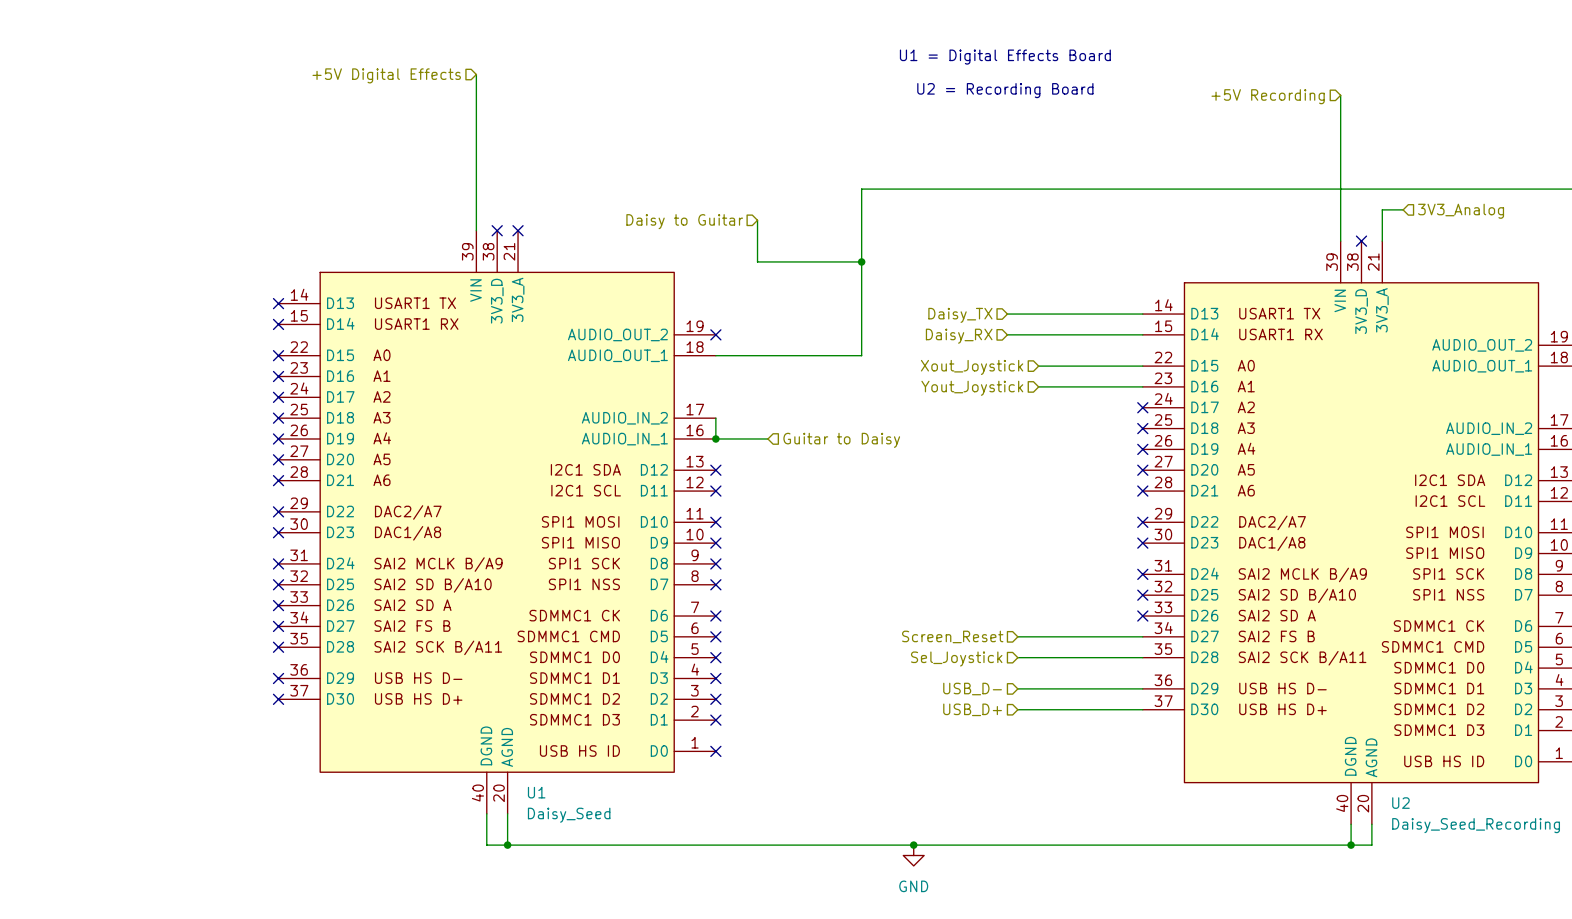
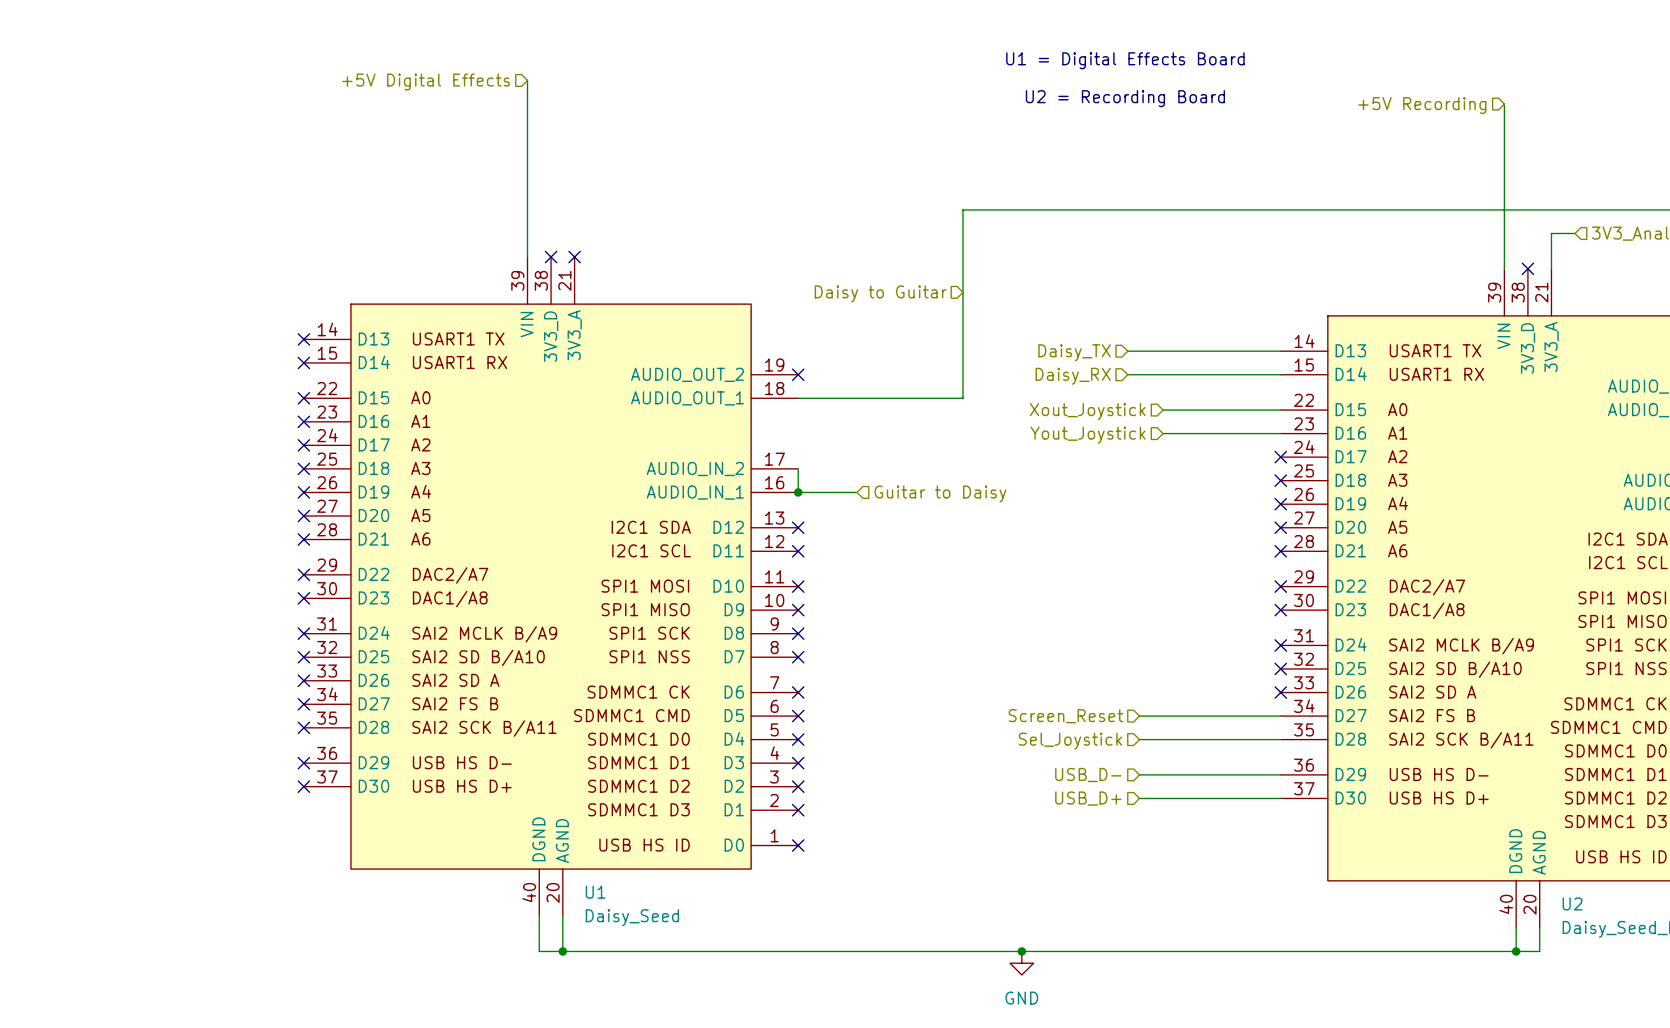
wire: (757, 220) (757, 261) (861, 261) -> none
hierarchical label position: Daisy to Guitar (684, 221) -> Daisy to Guitar (880, 293)
junction: (861, 261) -> none

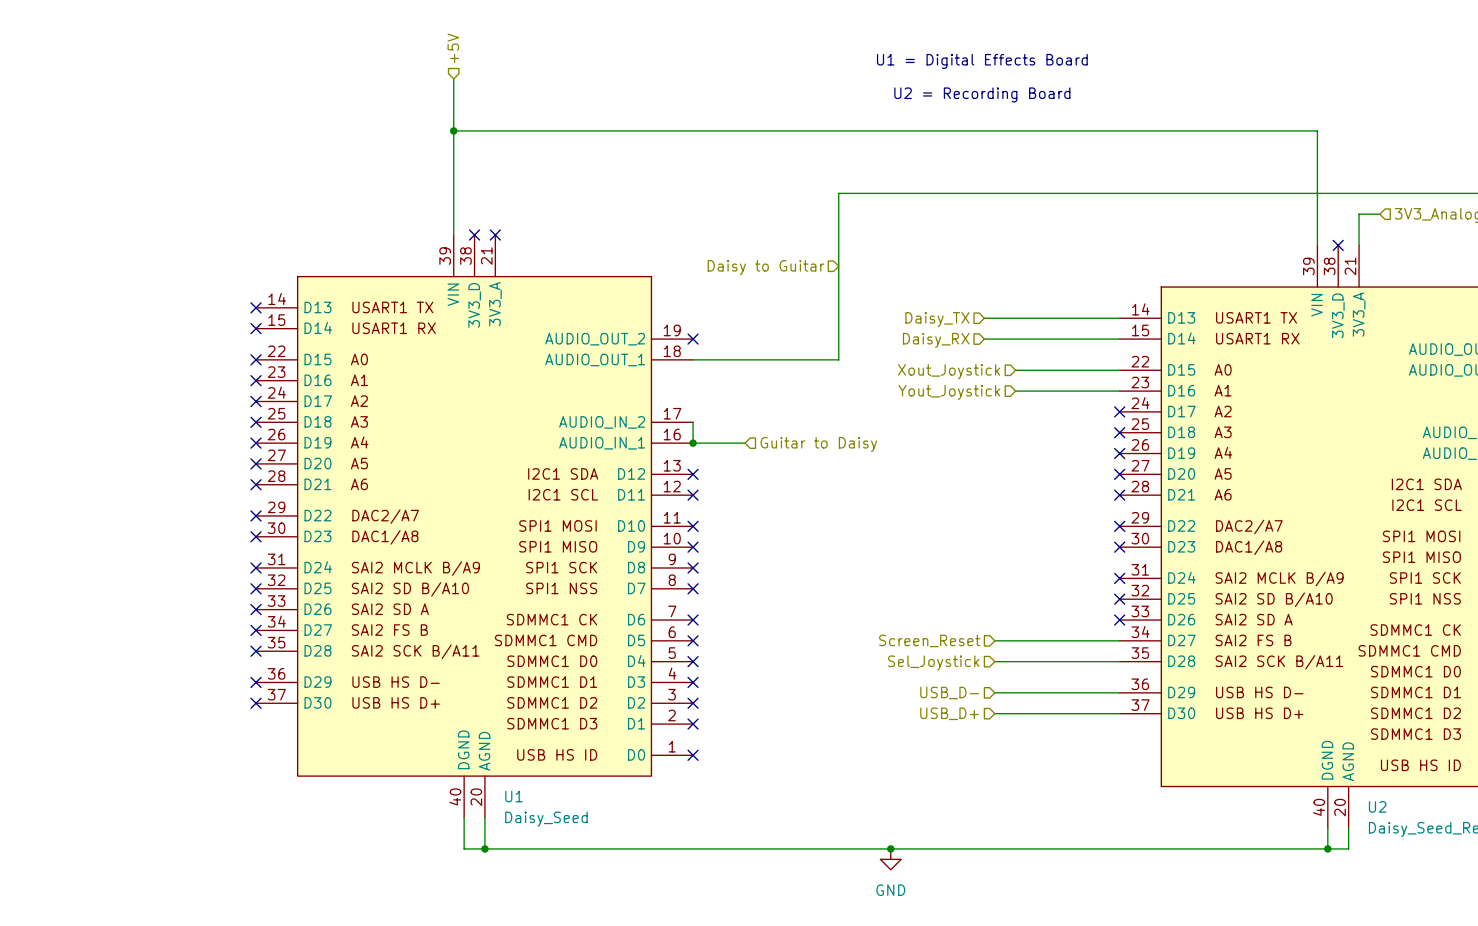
hierarchical label: none -> +5V (453, 48)
hierarchical label: +5V Digital Effects (426, 82) -> none
wire: (1504, 104) (1504, 139) -> (453, 130) (1317, 130)
hierarchical label: +5V Recording (1422, 105) -> none
junction: none -> (453, 130)

